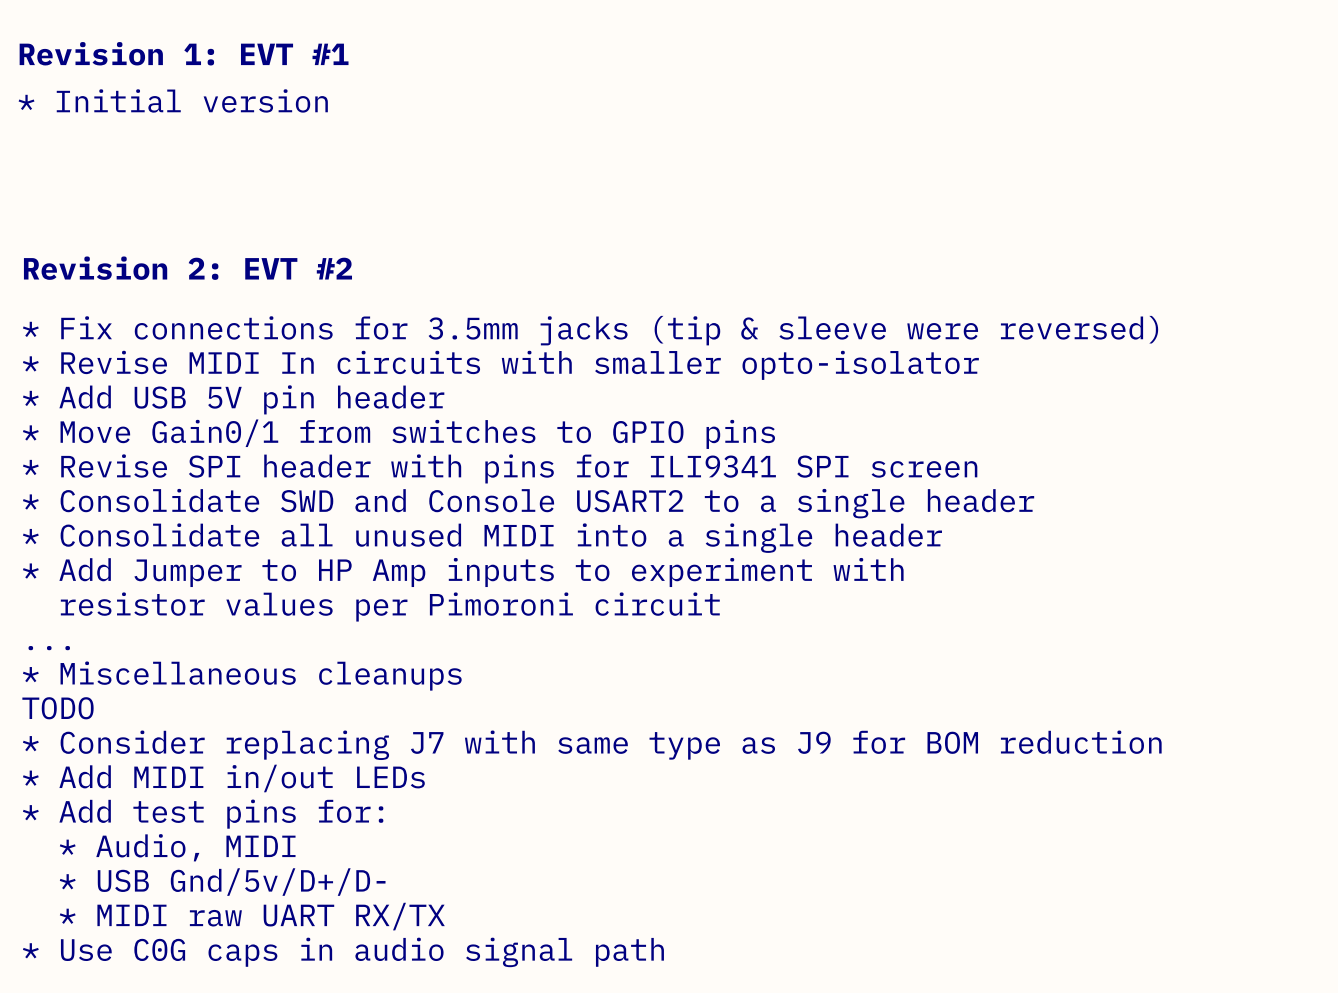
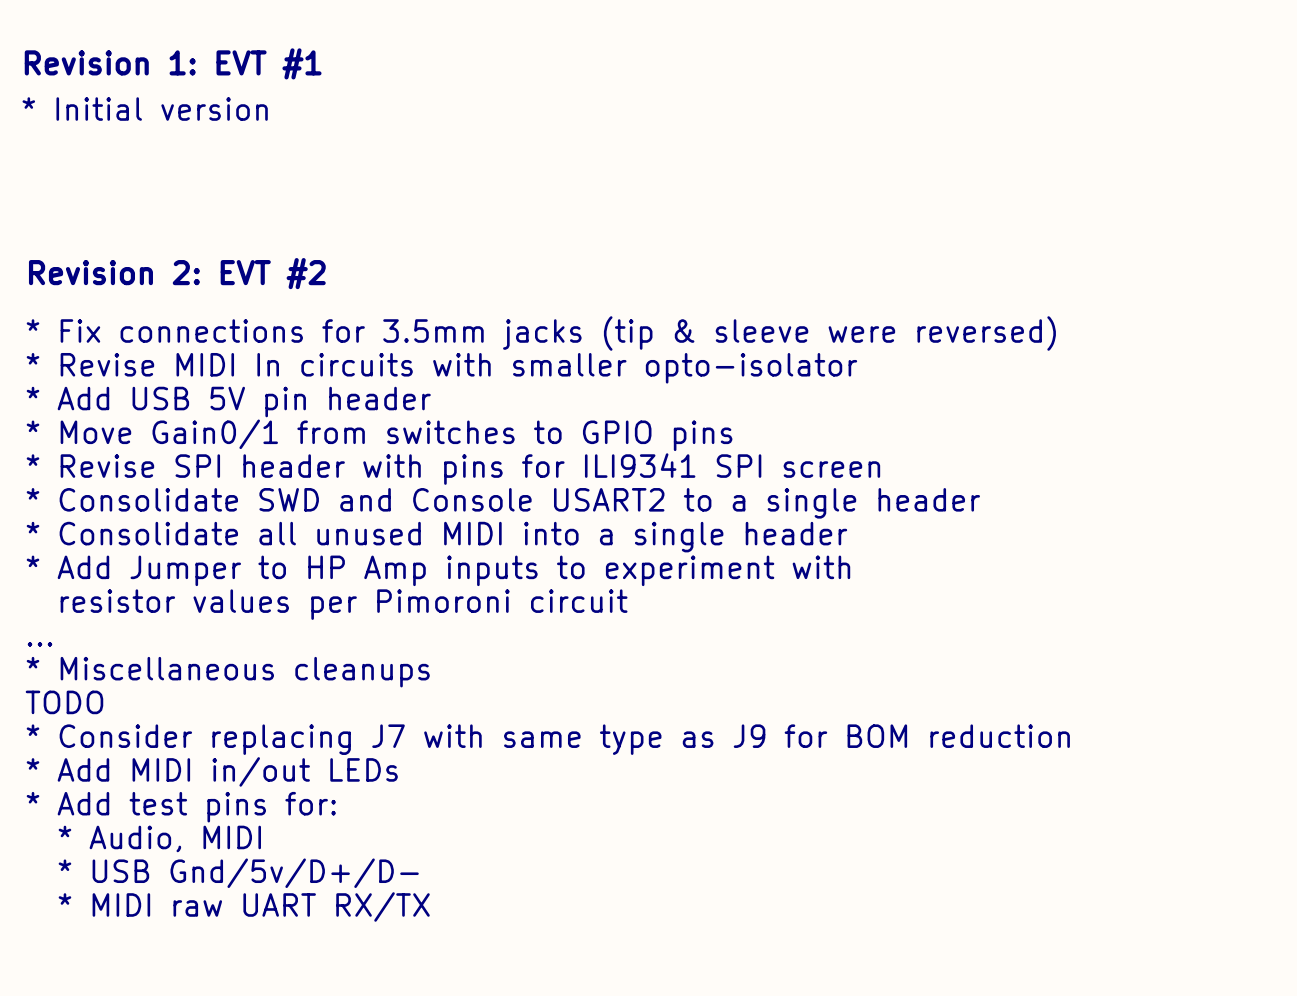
text: * Use C0G caps in audio signal path (343, 952) -> none

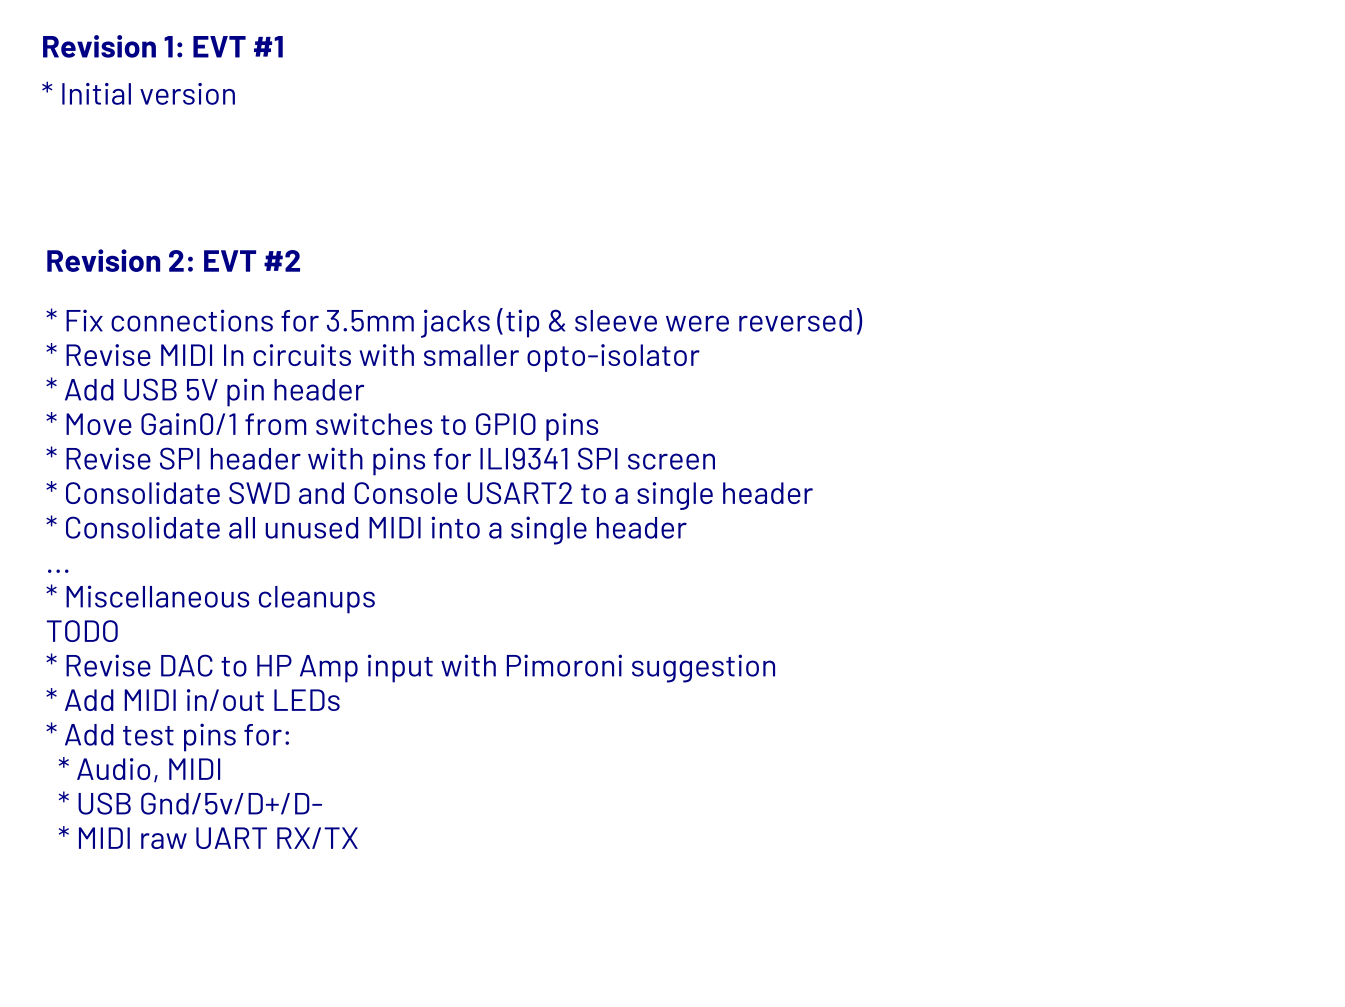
text: * Add Jumper to HP Amp inputs to experiment with (438, 570) -> ... (58, 571)
text: resistor values per Pimoroni circuit (344, 604) -> * Miscellaneous cleanups (210, 598)
text: ... (39, 644) -> TODO (82, 631)
text: * Miscellaneous cleanups (228, 672) -> * Revise DAC to HP Amp input with Pimoroni suggestion (410, 667)
text: TODO (64, 702) -> * Add MIDI in/out LEDs (193, 699)
text: * Consider replacing J7 with same type as J9 for BOM reduction (548, 739) -> * Add test pins for: (167, 736)
text: * Add MIDI in/out LEDs (212, 771) -> * Audio, MIDI (139, 769)
text: * Add test pins for: (181, 807) -> * USB Gnd/5v/D+/D- (190, 803)
text: * Audio, MIDI (159, 838) -> * MIDI raw UART RX/TX (208, 837)
text: * USB Gnd/5v/D+/D- (238, 873) -> none
text: * MIDI raw UART RX/TX (244, 906) -> none

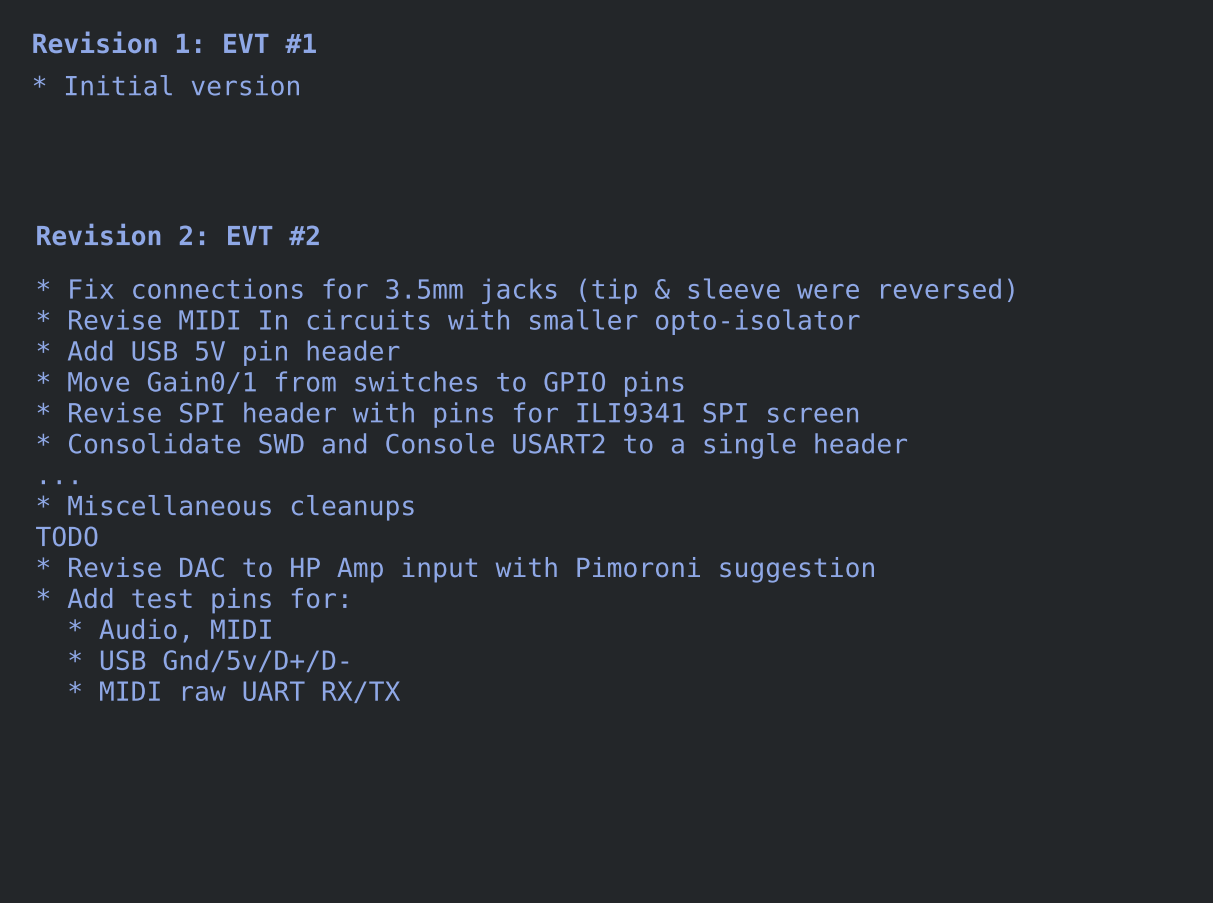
text: * Consolidate all unused MIDI into a single header (366, 529) -> ... (59, 482)
text: ... (58, 571) -> * Miscellaneous cleanups (225, 507)
text: * Miscellaneous cleanups (210, 598) -> TODO (66, 536)
text: TODO (82, 631) -> * Revise DAC to HP Amp input with Pimoroni suggestion (455, 569)
text: * Revise DAC to HP Amp input with Pimoroni suggestion (410, 667) -> * Add test pins for: (192, 600)
text: * Add MIDI in/out LEDs (193, 699) -> * Audio, MIDI (170, 630)
text: * Add test pins for: (167, 736) -> * USB Gnd/5v/D+/D- (208, 660)
text: * Audio, MIDI (139, 769) -> * MIDI raw UART RX/TX (234, 692)
text: * USB Gnd/5v/D+/D- (190, 803) -> none
text: * MIDI raw UART RX/TX (208, 837) -> none

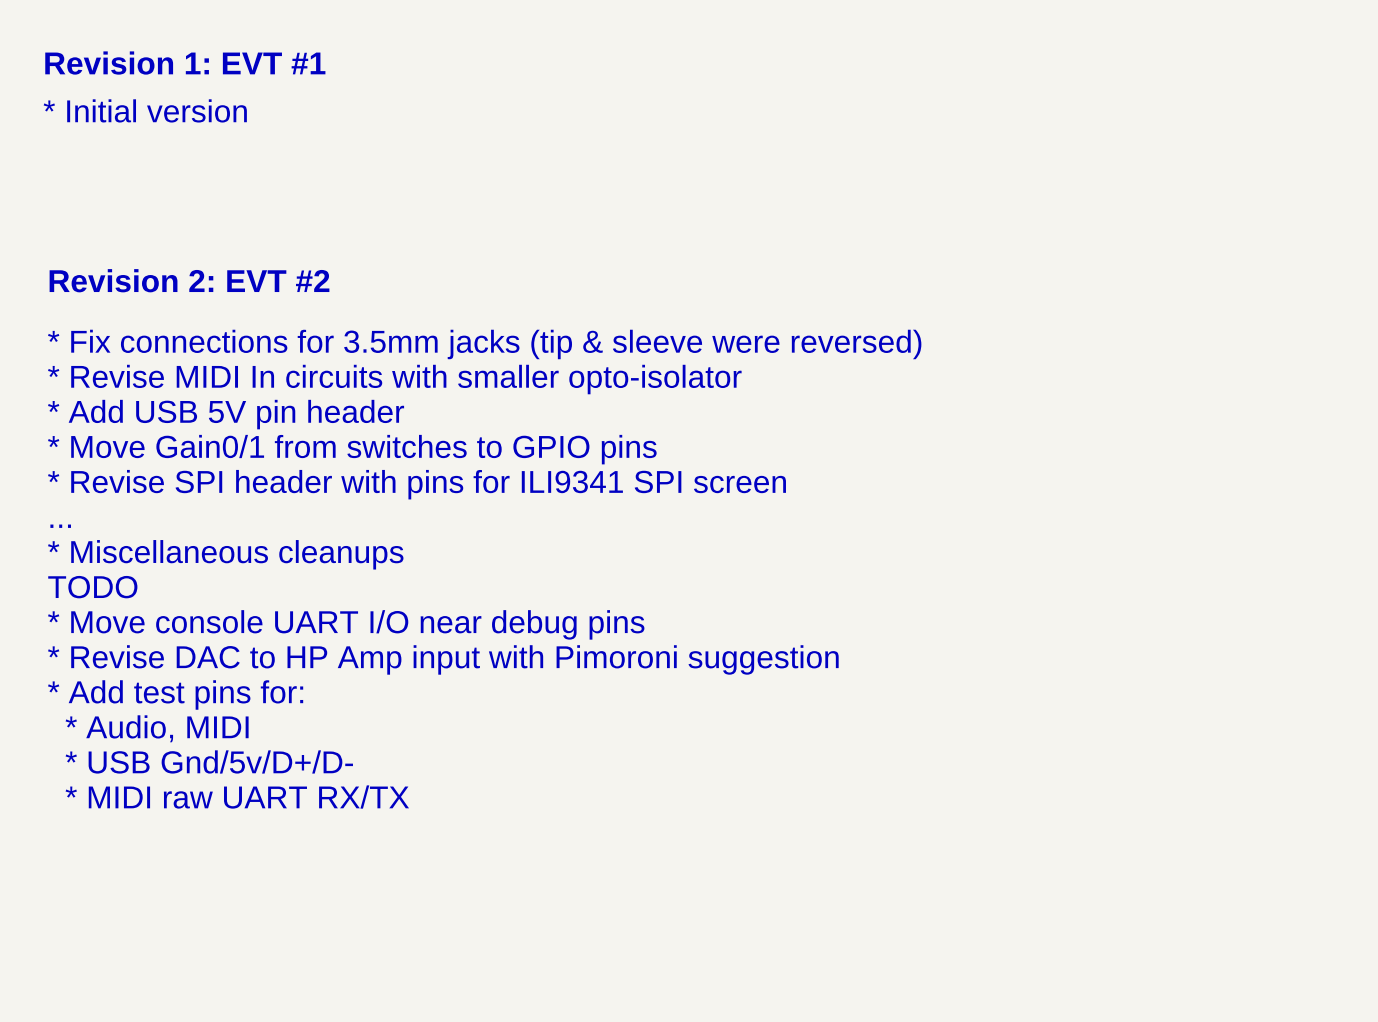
text: * Consolidate SWD and Console USART2 to a single header (472, 446) -> ... (60, 526)
text: ... (59, 482) -> * Miscellaneous cleanups (225, 554)
text: * Miscellaneous cleanups (225, 507) -> TODO (92, 587)
text: TODO (66, 536) -> * Move console UART I/O near debug pins (346, 624)

